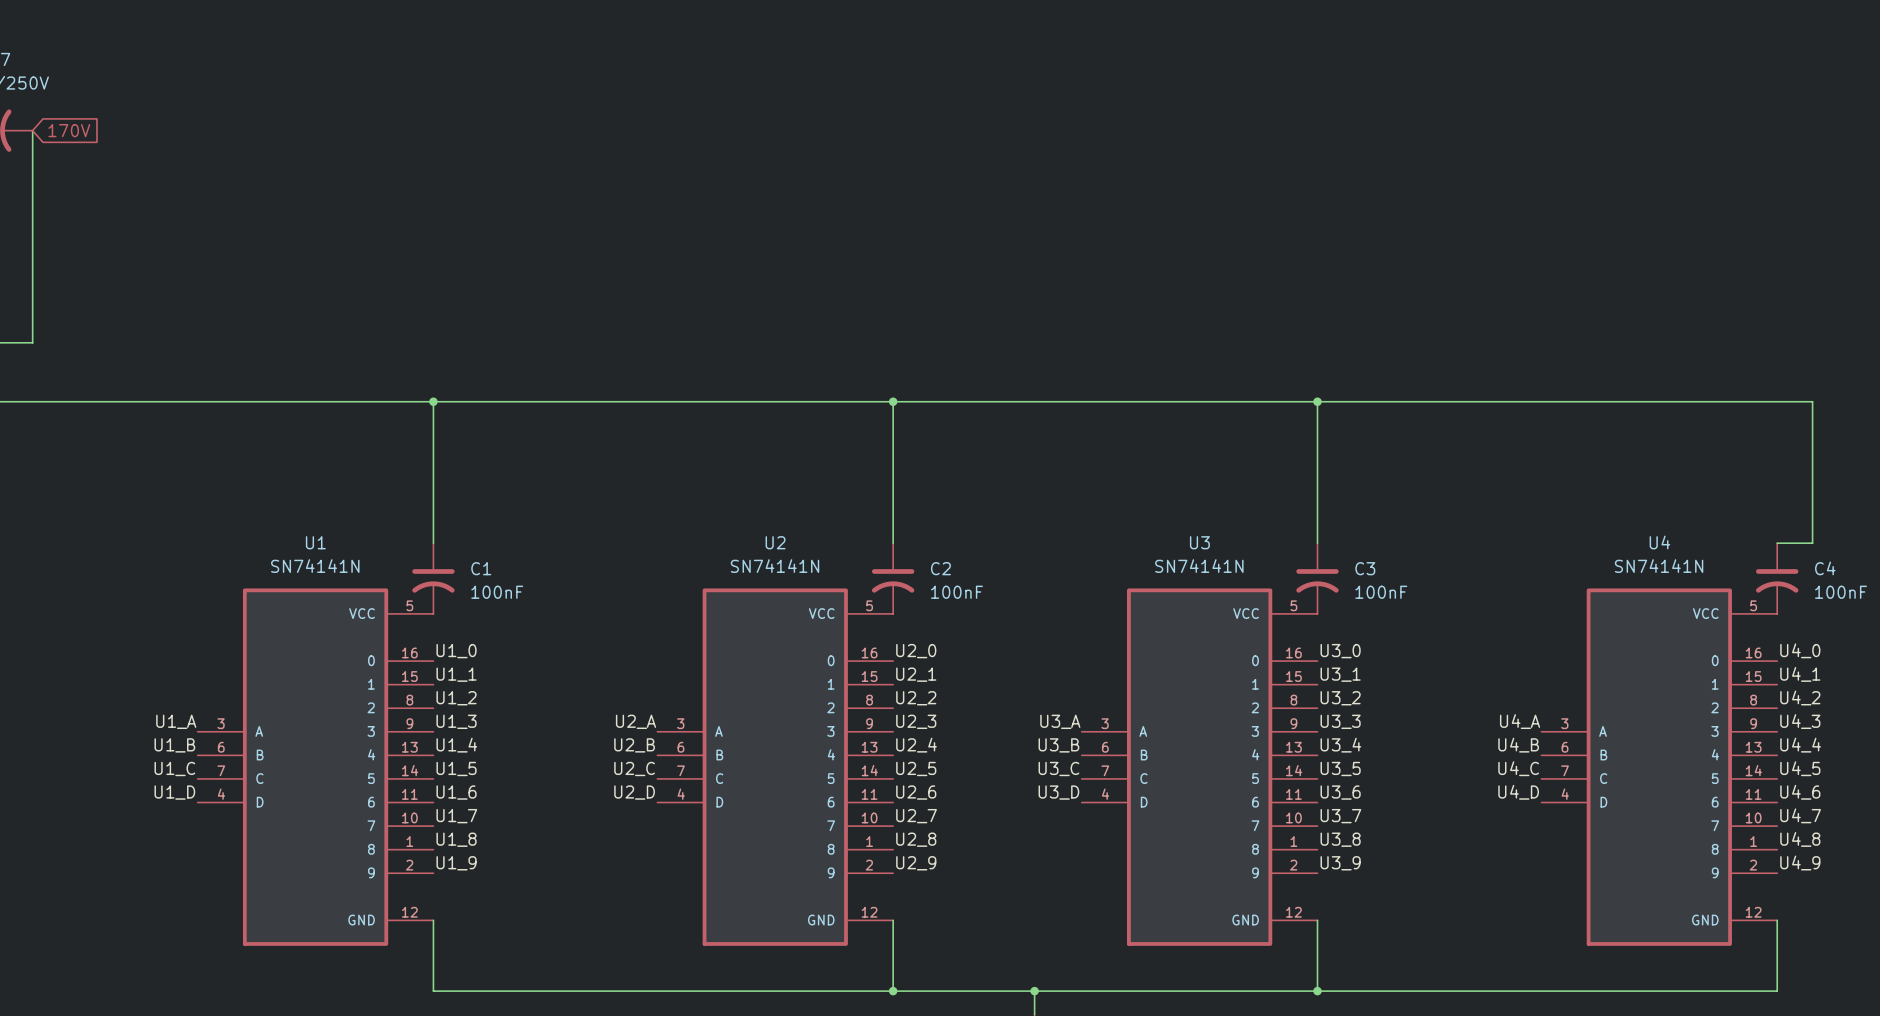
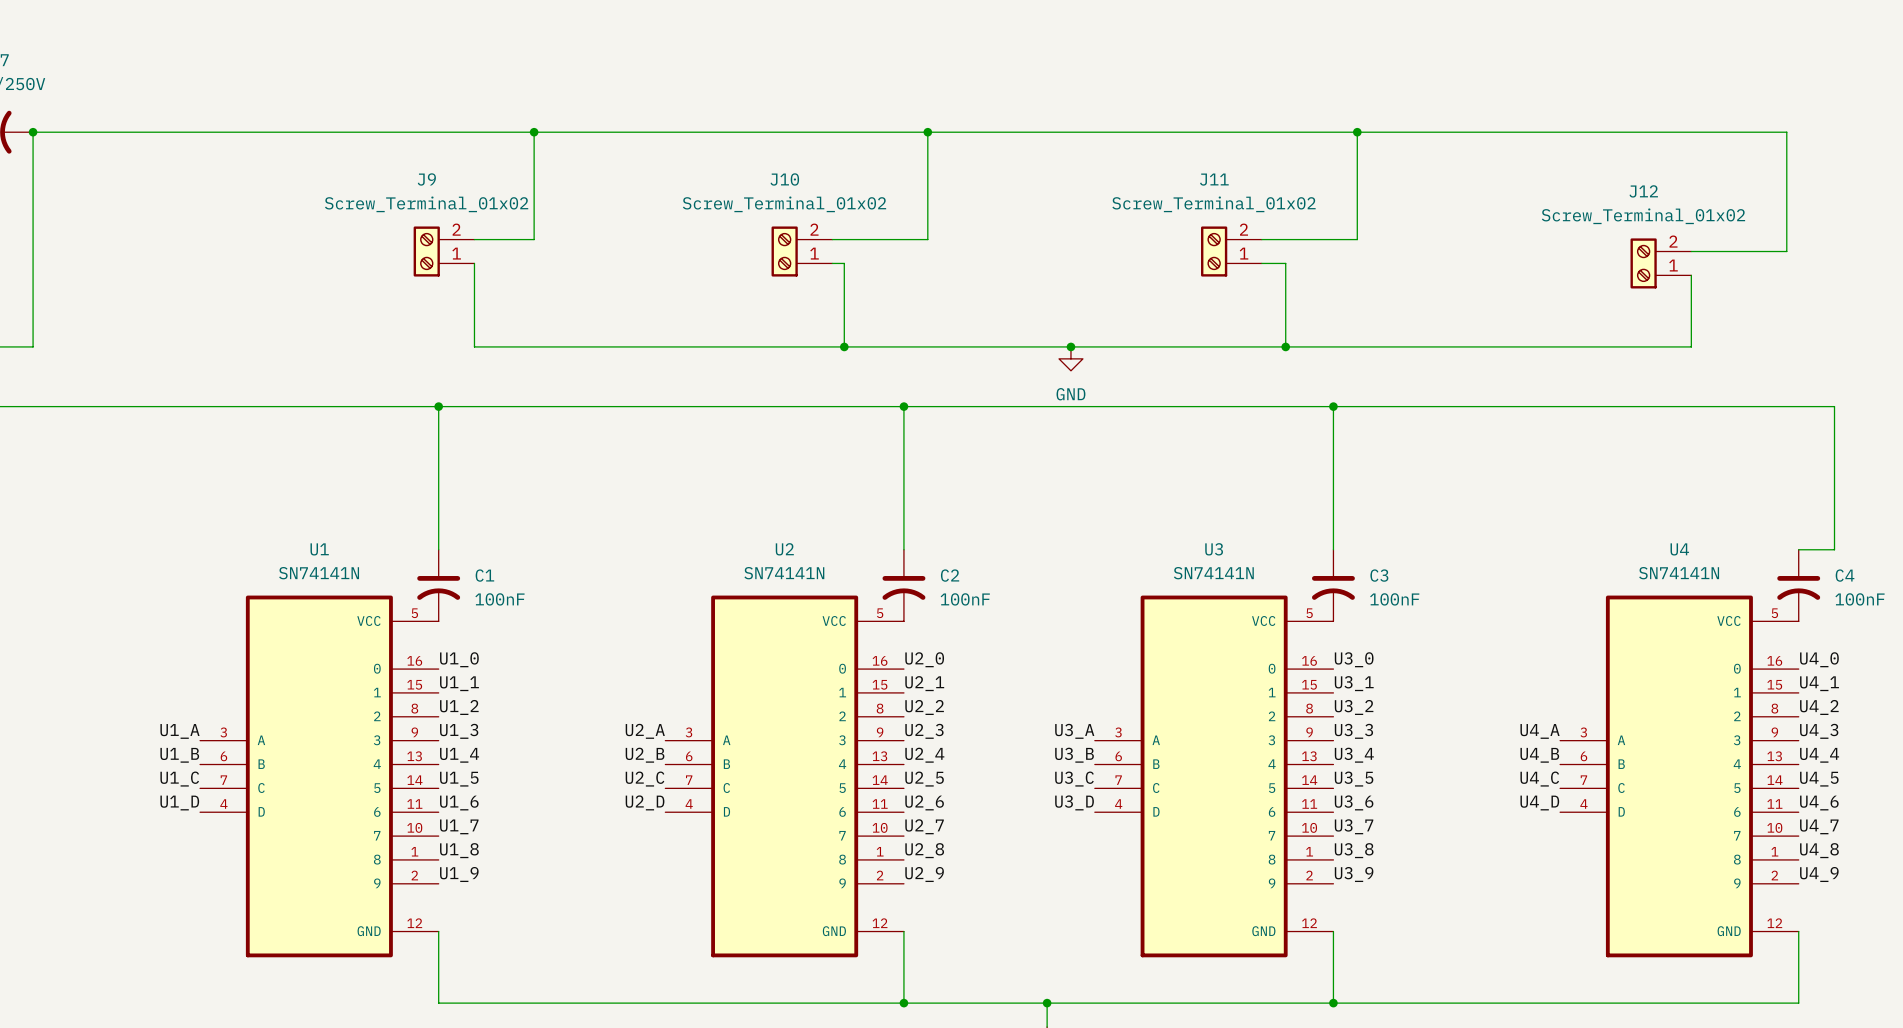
wire: none -> (33, 132) (1786, 132) (1786, 251) (1691, 251)
junction: none -> (33, 132)
global label: 170V (69, 130) -> none
wire: none -> (534, 132) (534, 239) (474, 239)
junction: none -> (534, 132)
wire: none -> (927, 132) (927, 239) (832, 239)
junction: none -> (927, 132)
wire: none -> (1357, 132) (1357, 239) (1261, 239)
junction: none -> (1357, 132)
J9: none -> Screw_Terminal_01x02 (444, 251)
J10: none -> Screw_Terminal_01x02 (801, 251)
J11: none -> Screw_Terminal_01x02 (1231, 251)
wire: none -> (474, 263) (474, 346) (1691, 346) (1691, 275)
wire: none -> (832, 263) (844, 263) (844, 346)
wire: none -> (1261, 263) (1285, 263) (1285, 346)
J12: none -> Screw_Terminal_01x02 (1660, 263)
junction: none -> (844, 346)
junction: none -> (1070, 346)
junction: none -> (1285, 346)
power symbol: none -> GND (1070, 358)

